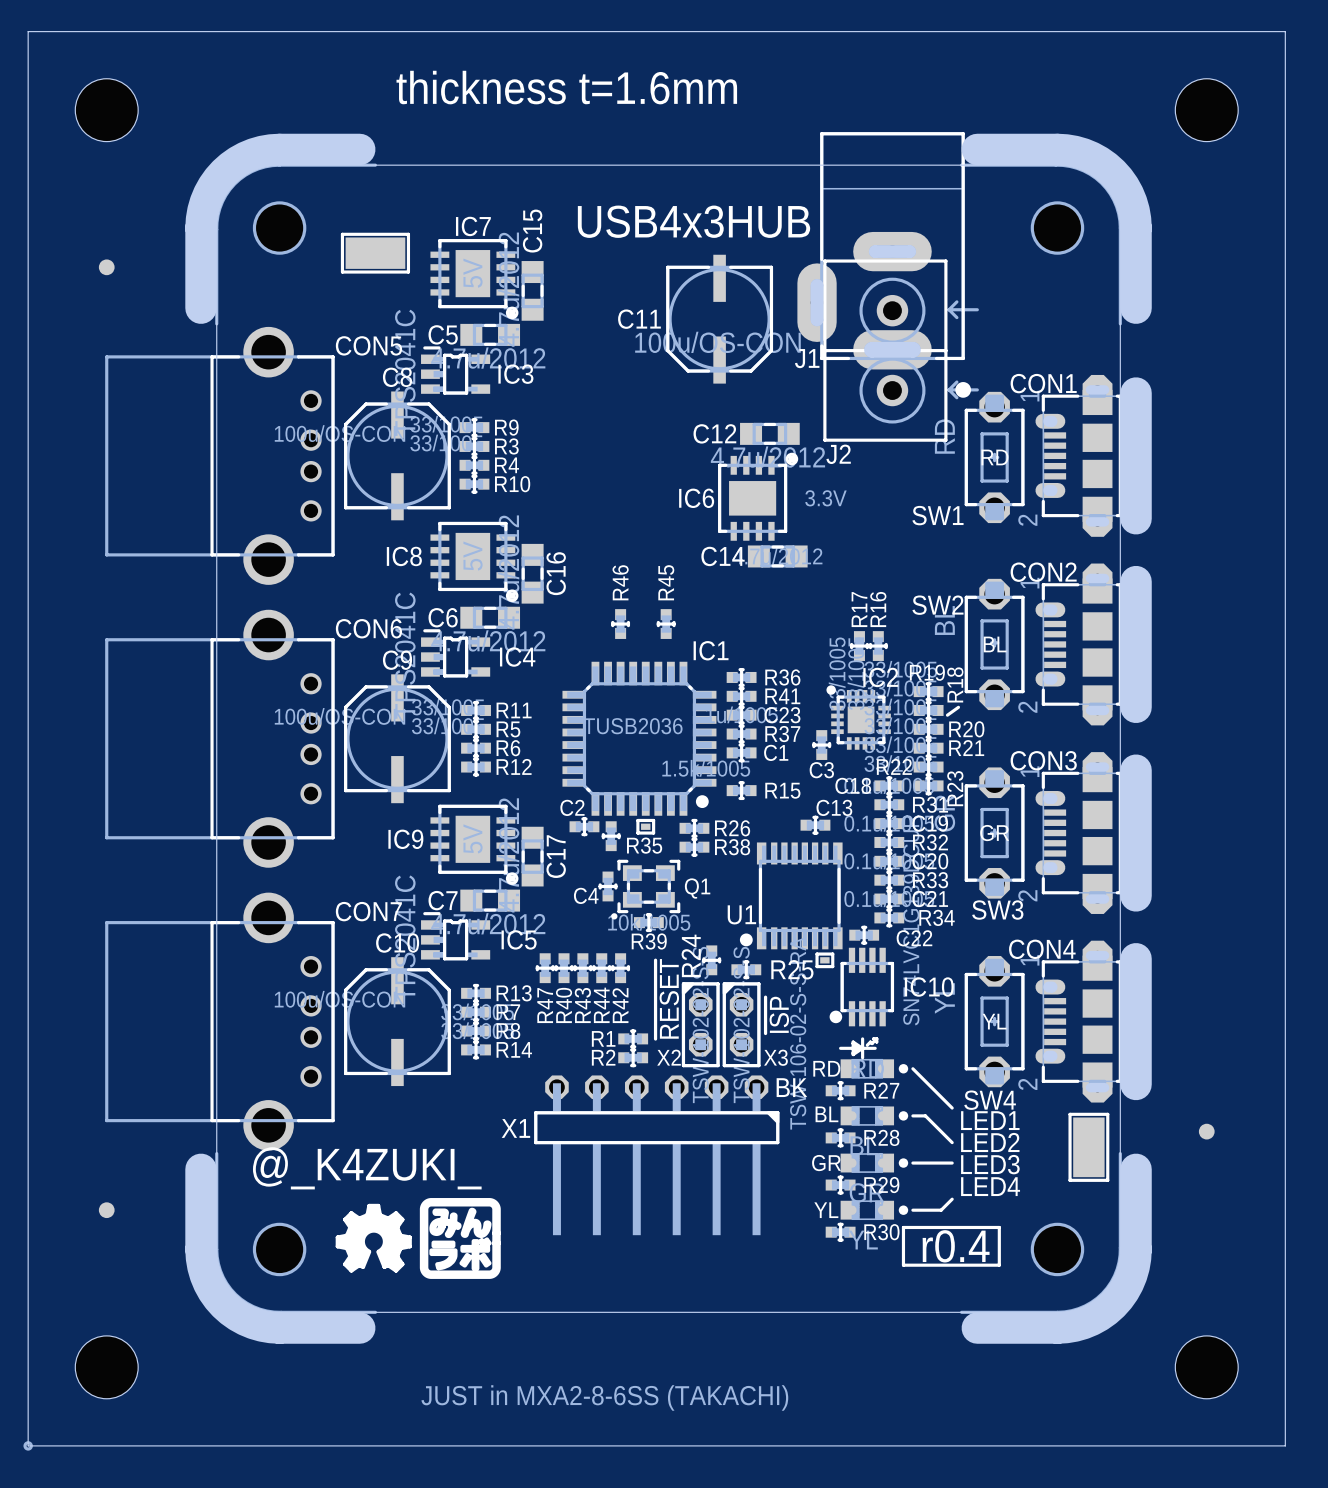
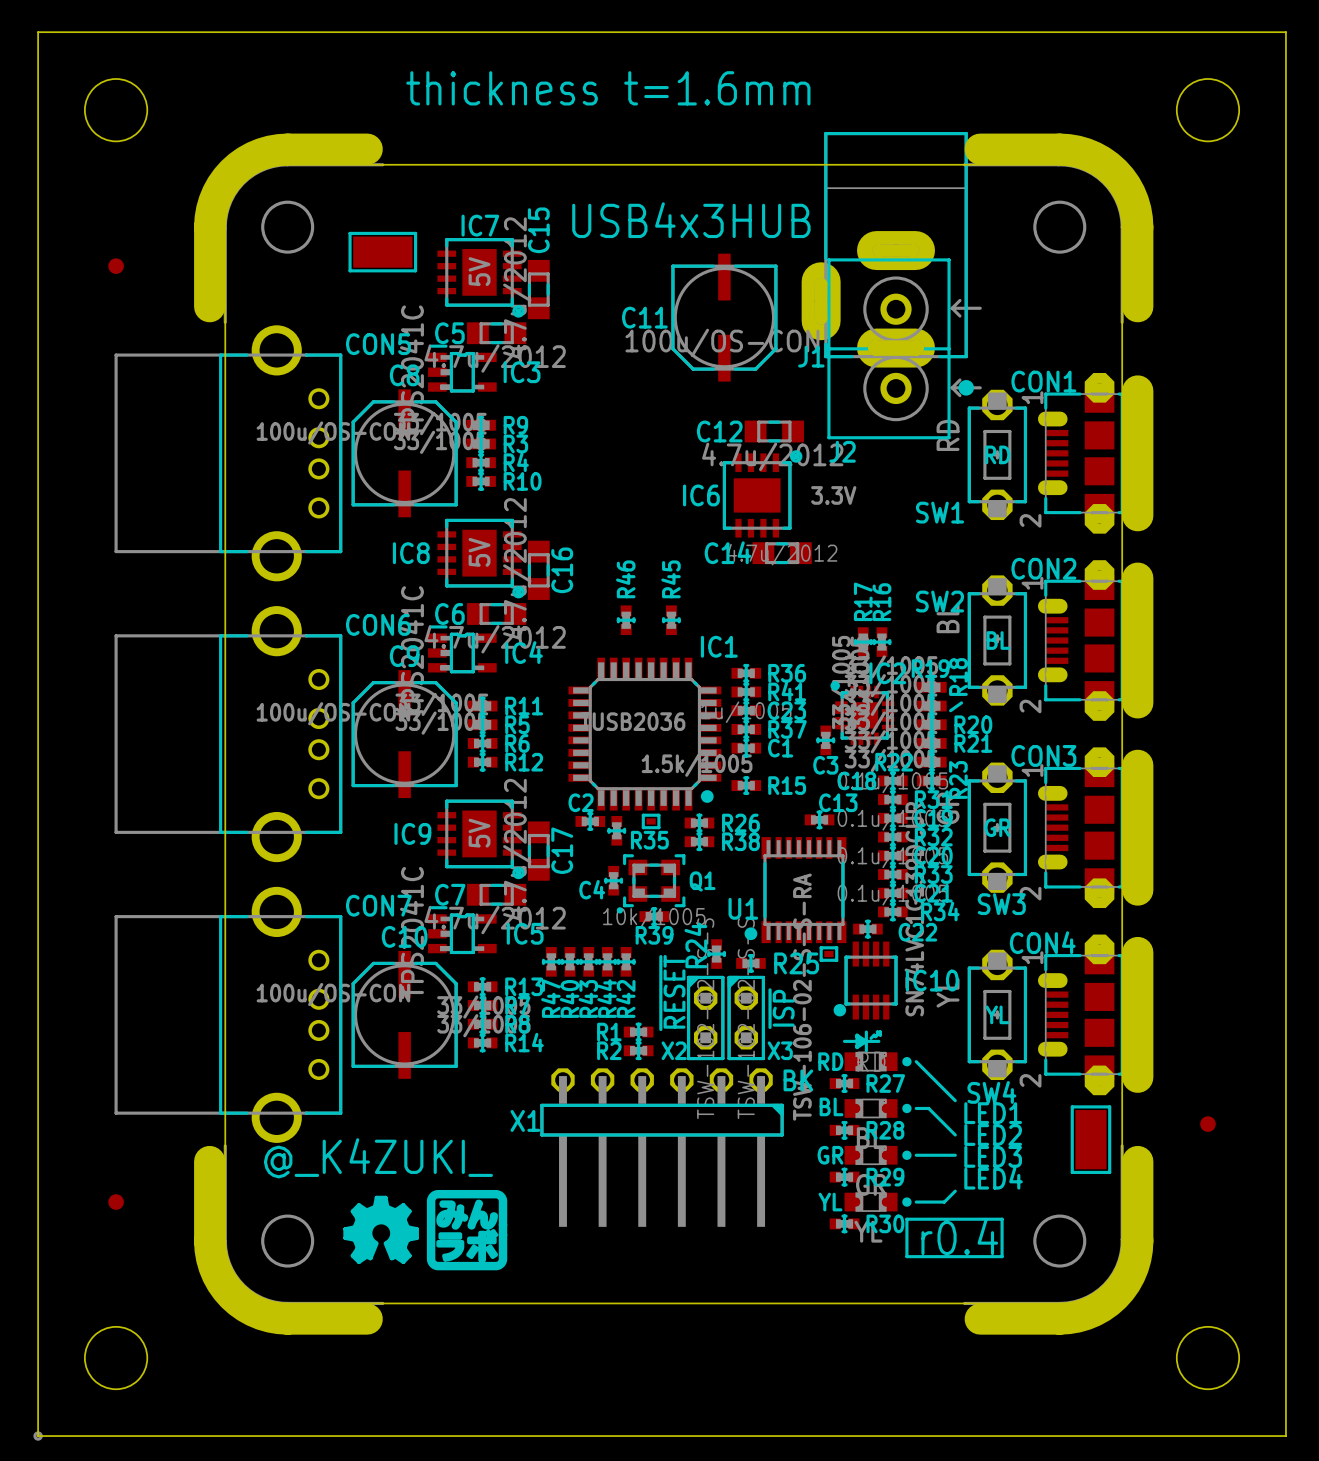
text: JUST in MXA2-8-6SS (TAKACHI) (604, 1397) -> none

